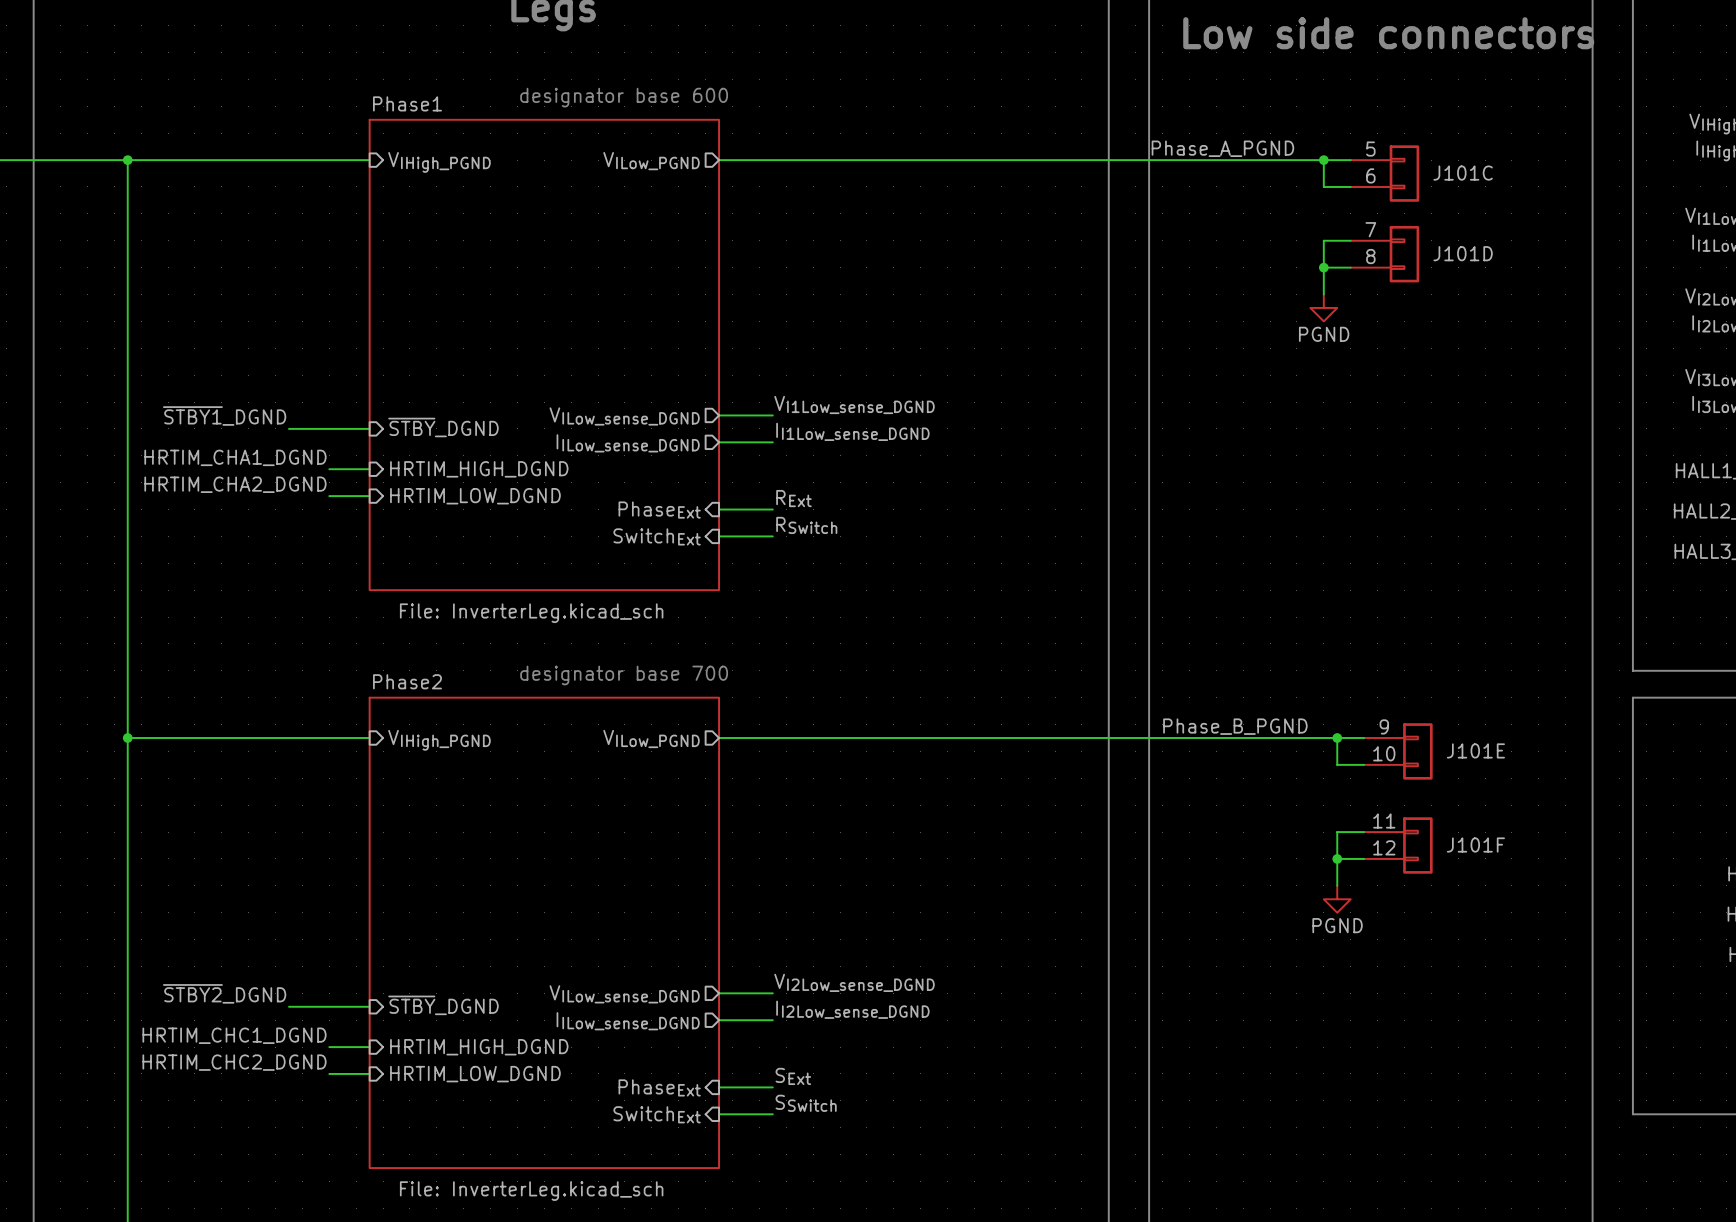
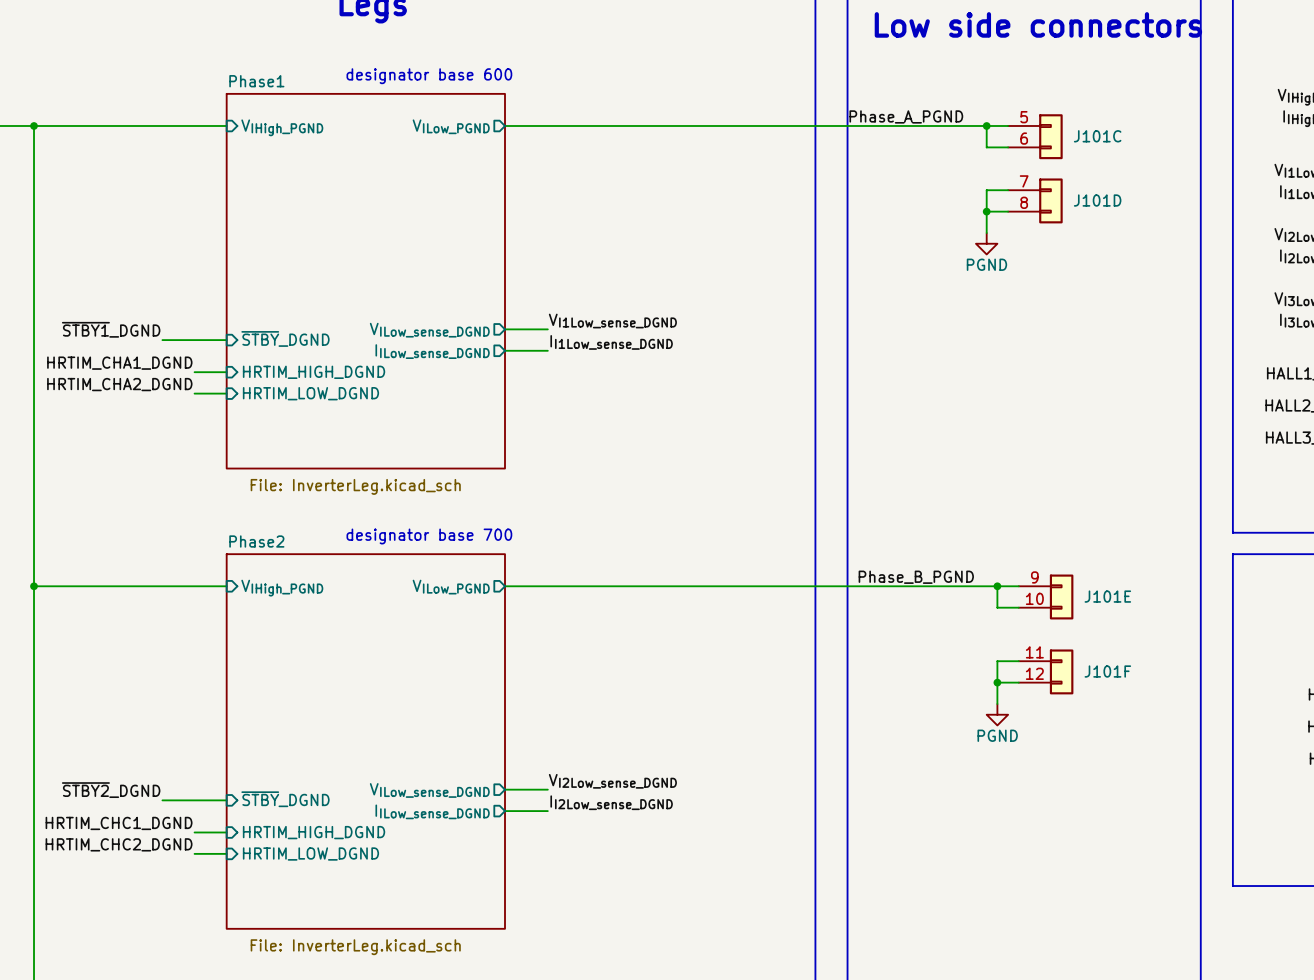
label: RExt (793, 498) -> none
wire: (719, 509) (772, 509) -> none
sheet pin: PhaseExt (659, 510) -> none
label: RSwitch (806, 525) -> none
sheet pin: SwitchExt (657, 536) -> none
wire: (719, 536) (772, 536) -> none
label: SExt (793, 1076) -> none
sheet pin: PhaseExt (659, 1087) -> none
wire: (719, 1087) (772, 1087) -> none
label: SSwitch (806, 1103) -> none
sheet pin: SwitchExt (657, 1114) -> none
wire: (719, 1114) (772, 1114) -> none

